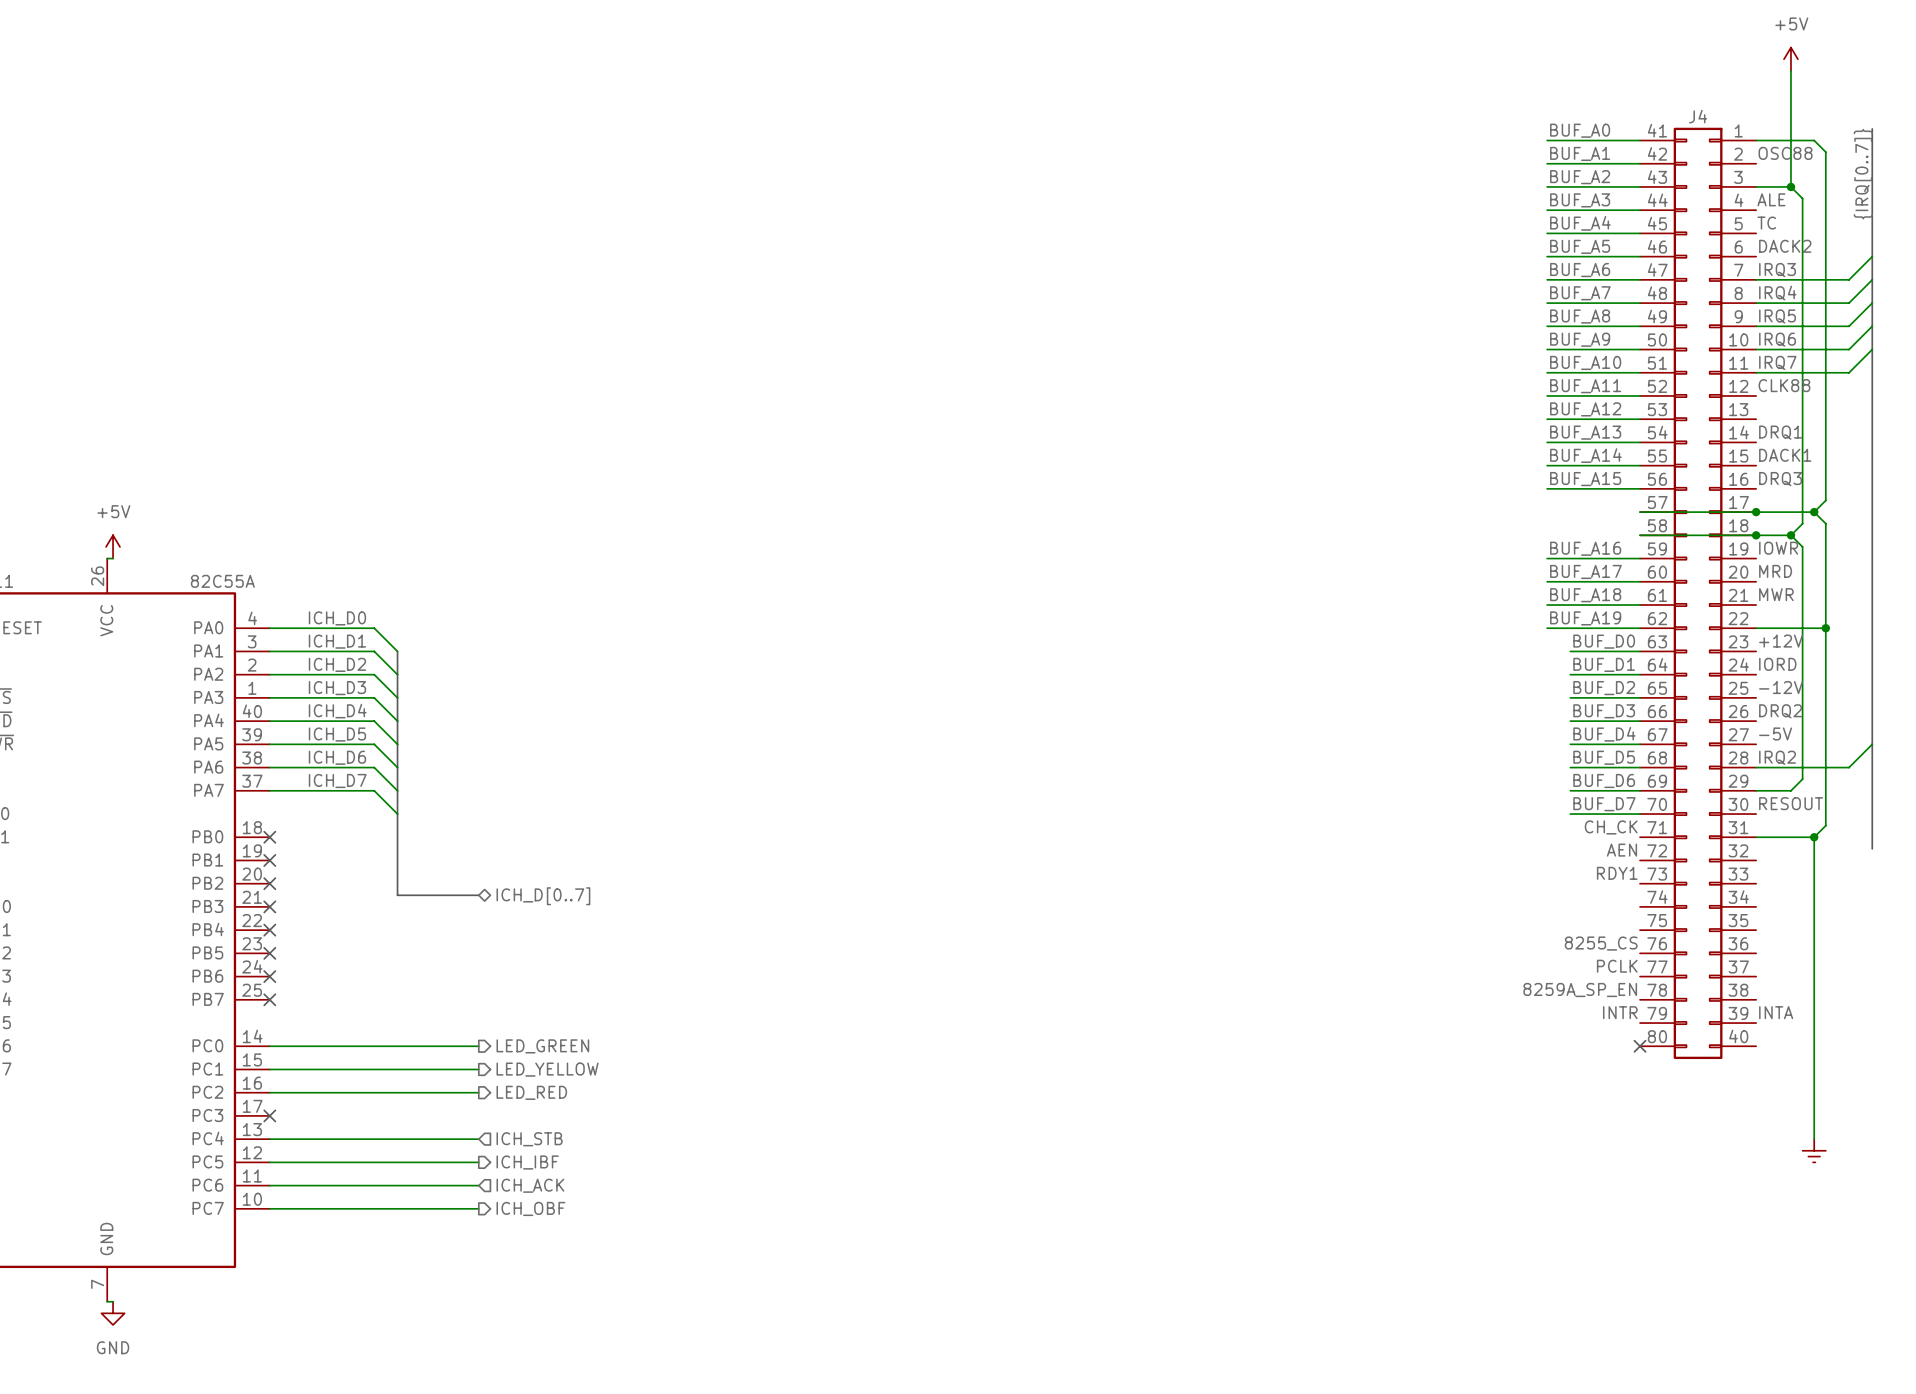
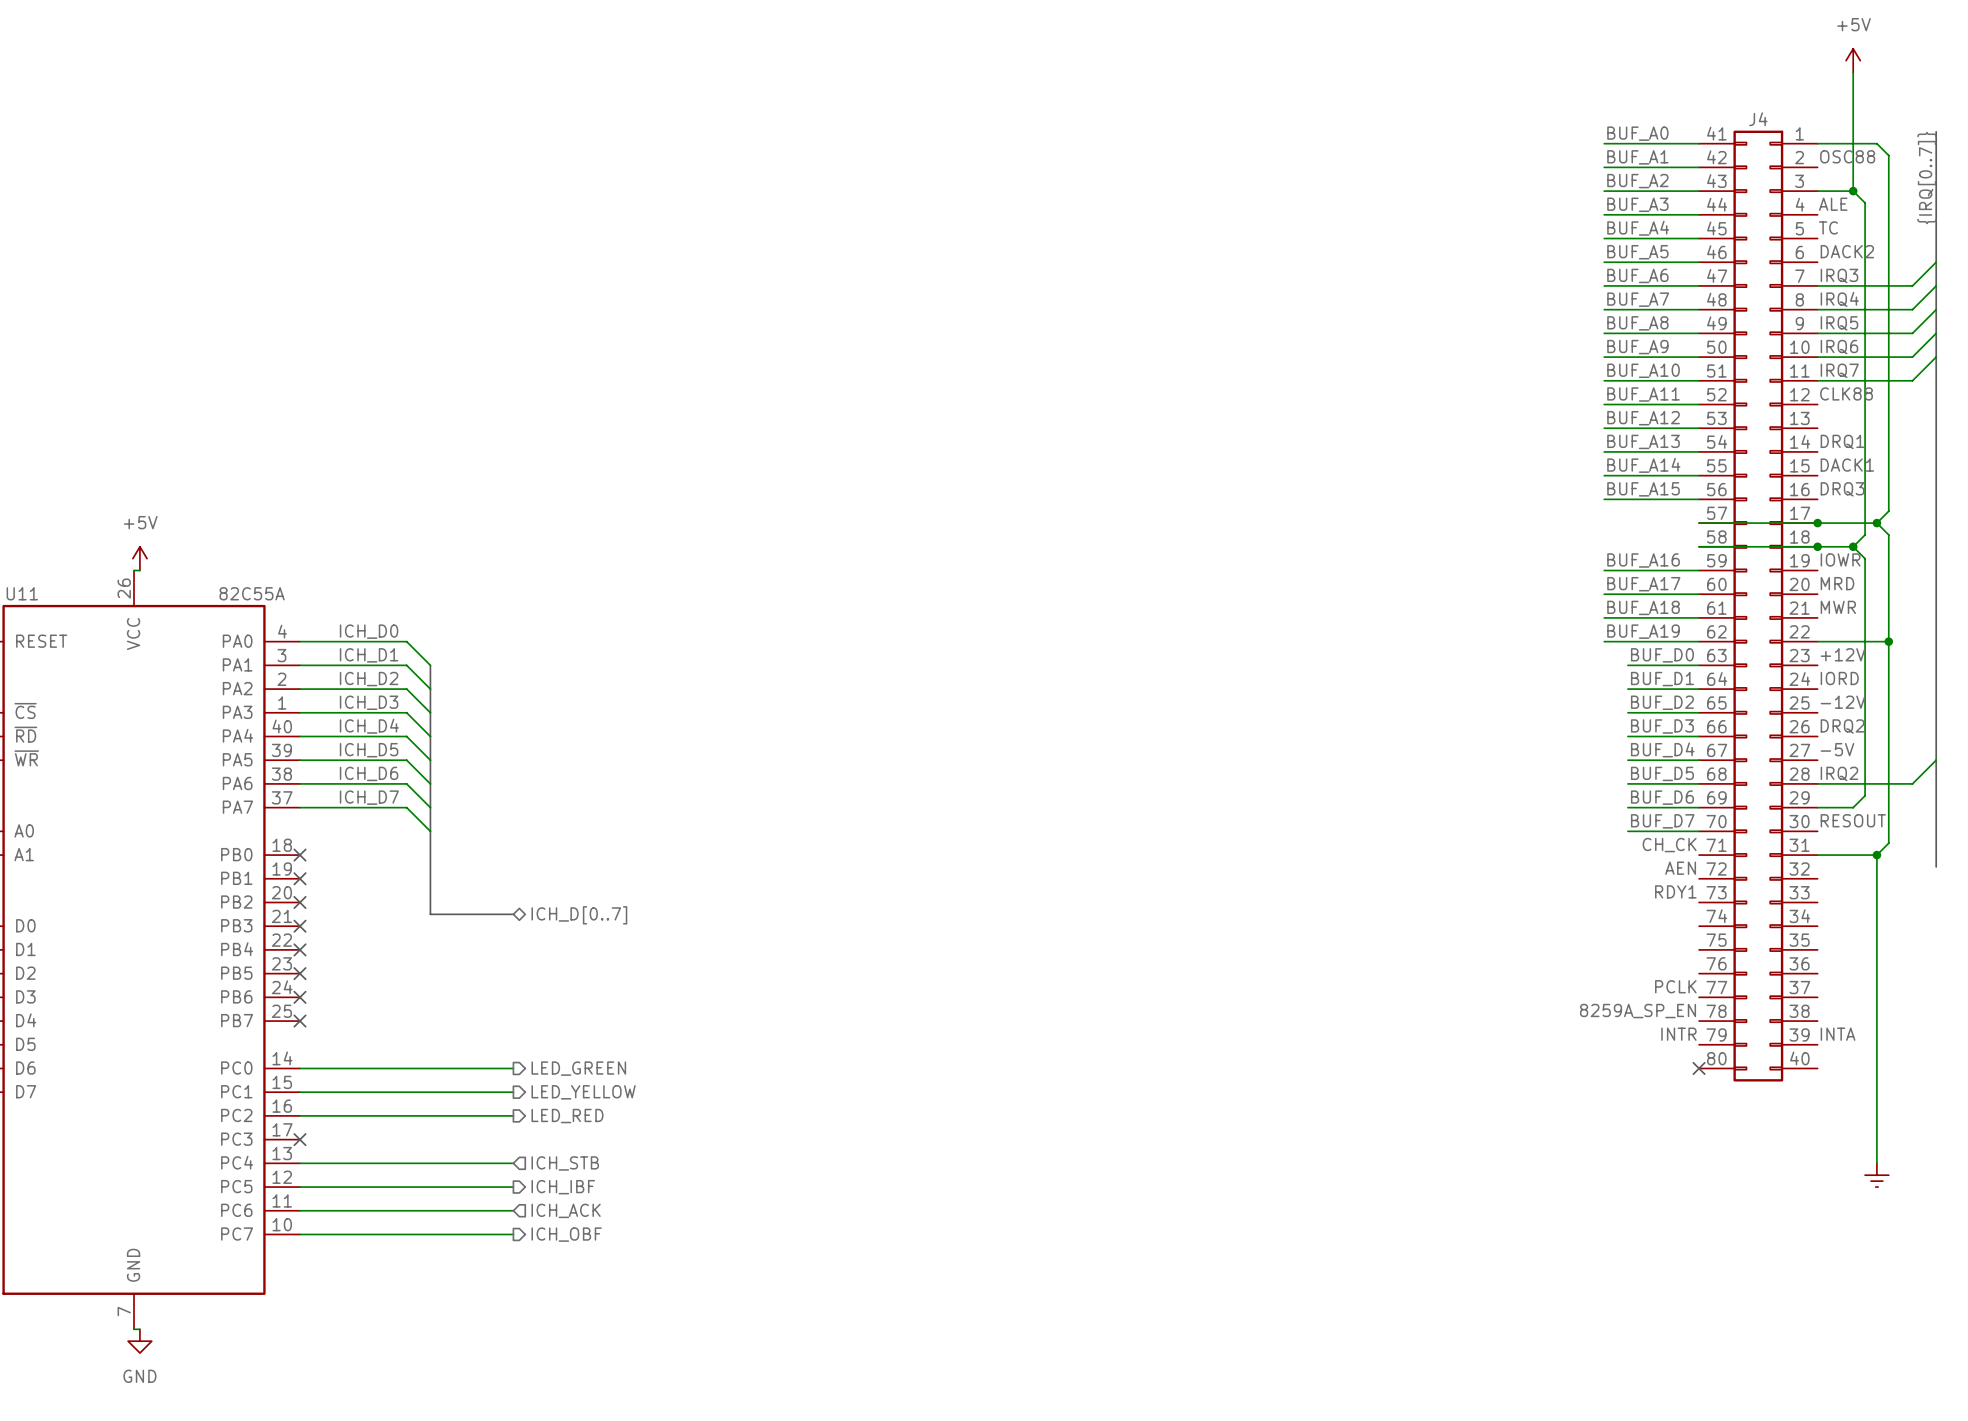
label: 8255_CS (1601, 943) -> none

